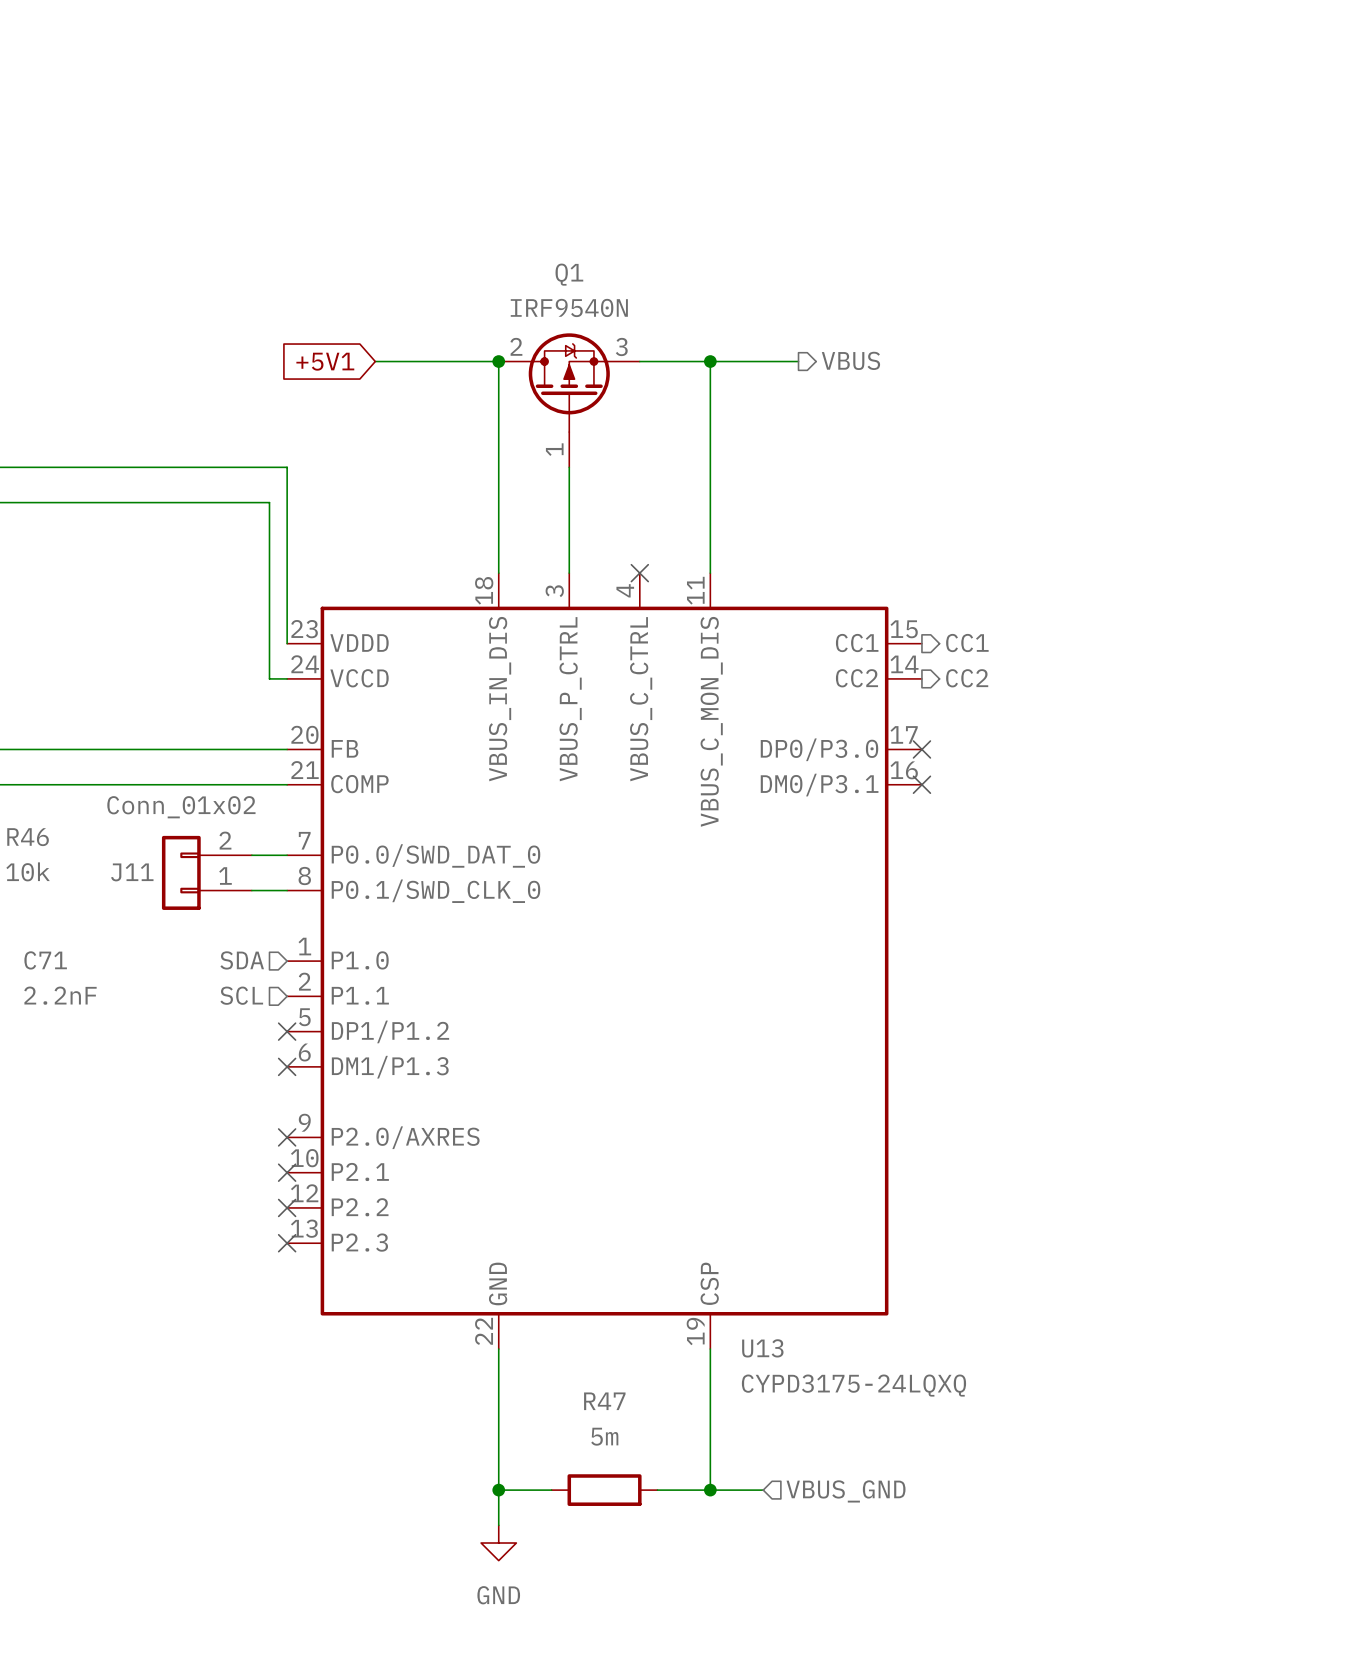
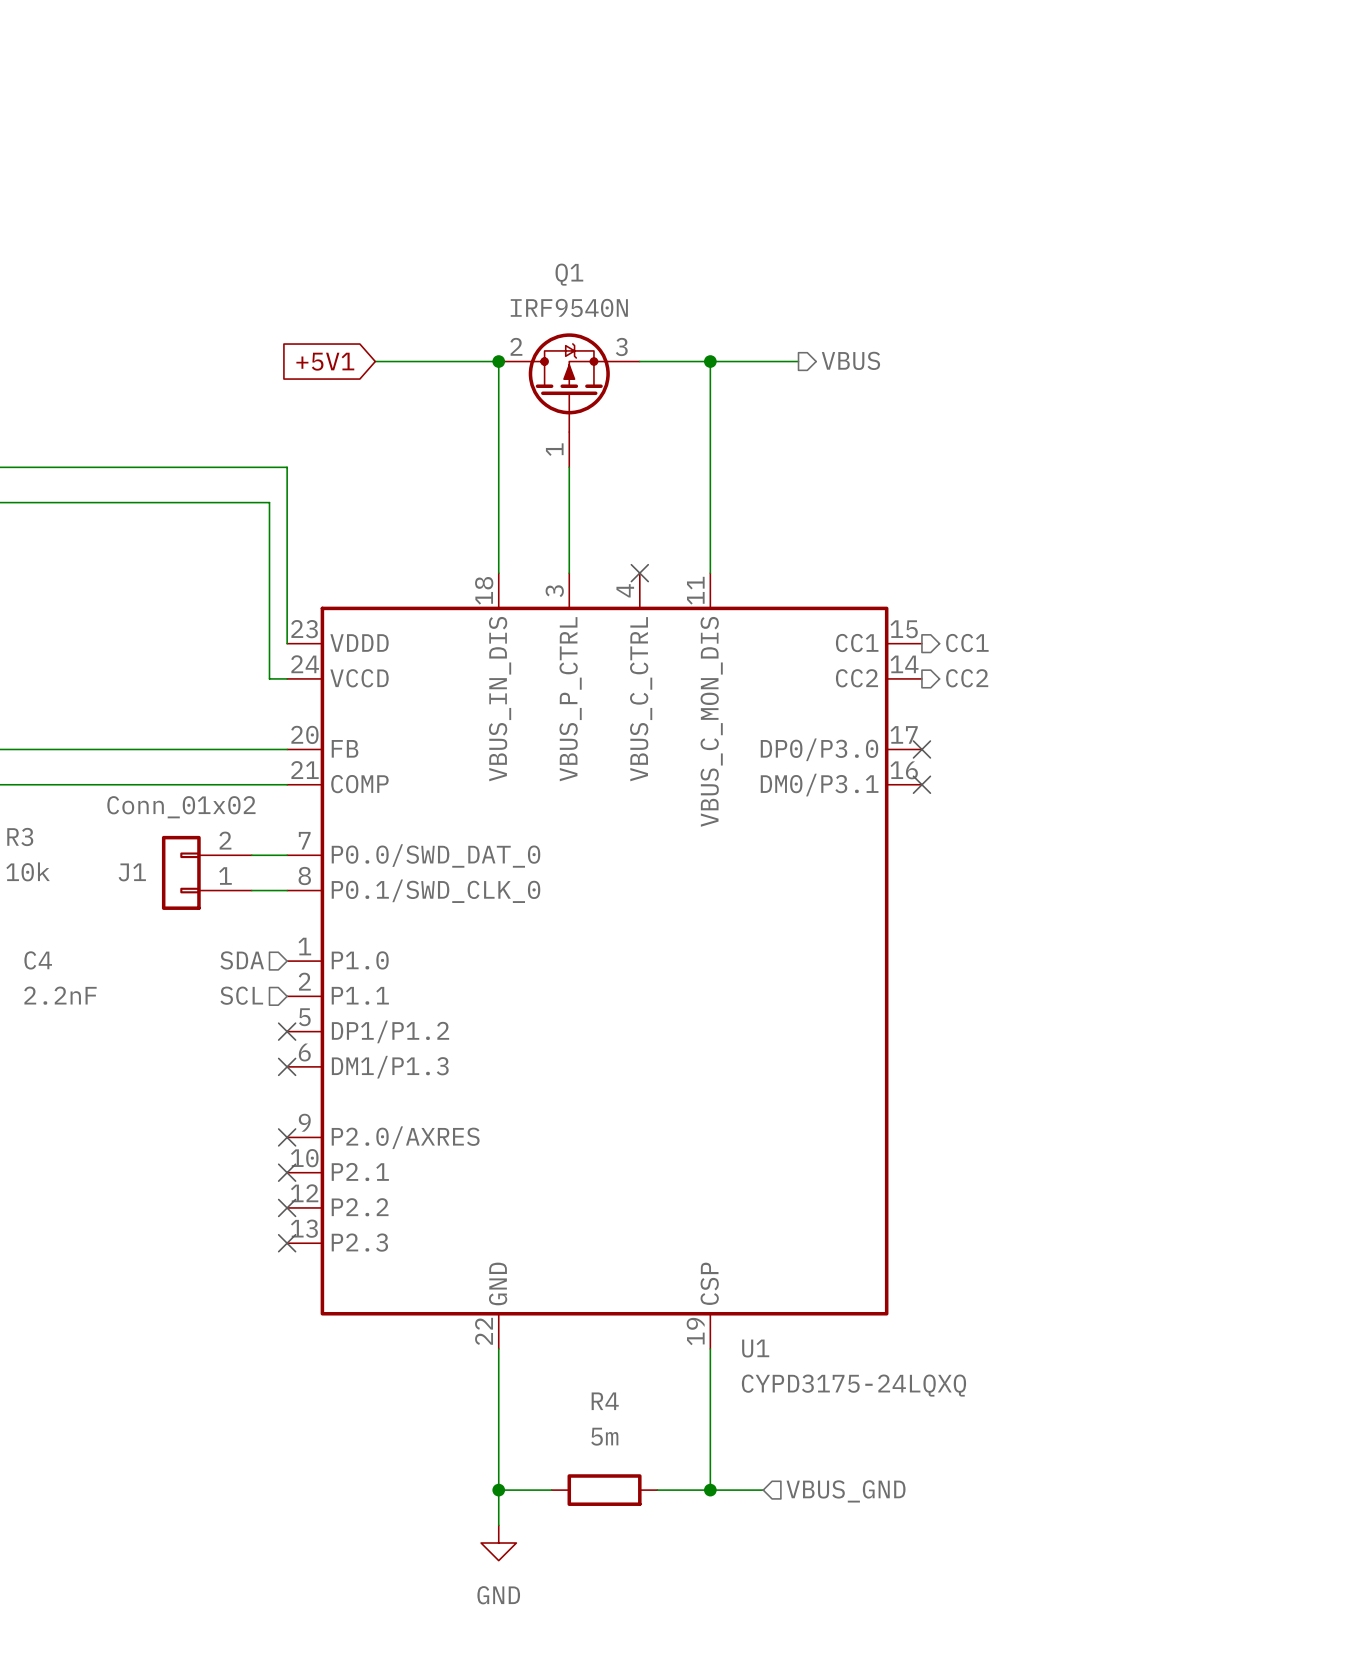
R46 name: R46 (28, 837) -> R3 (20, 836)
J11 name: J11 (132, 872) -> J1 (132, 872)
C71 name: C71 (45, 960) -> C4 (38, 960)
U13 name: U13 (762, 1348) -> U1 (755, 1348)
R47 name: R47 (604, 1401) -> R4 (605, 1401)

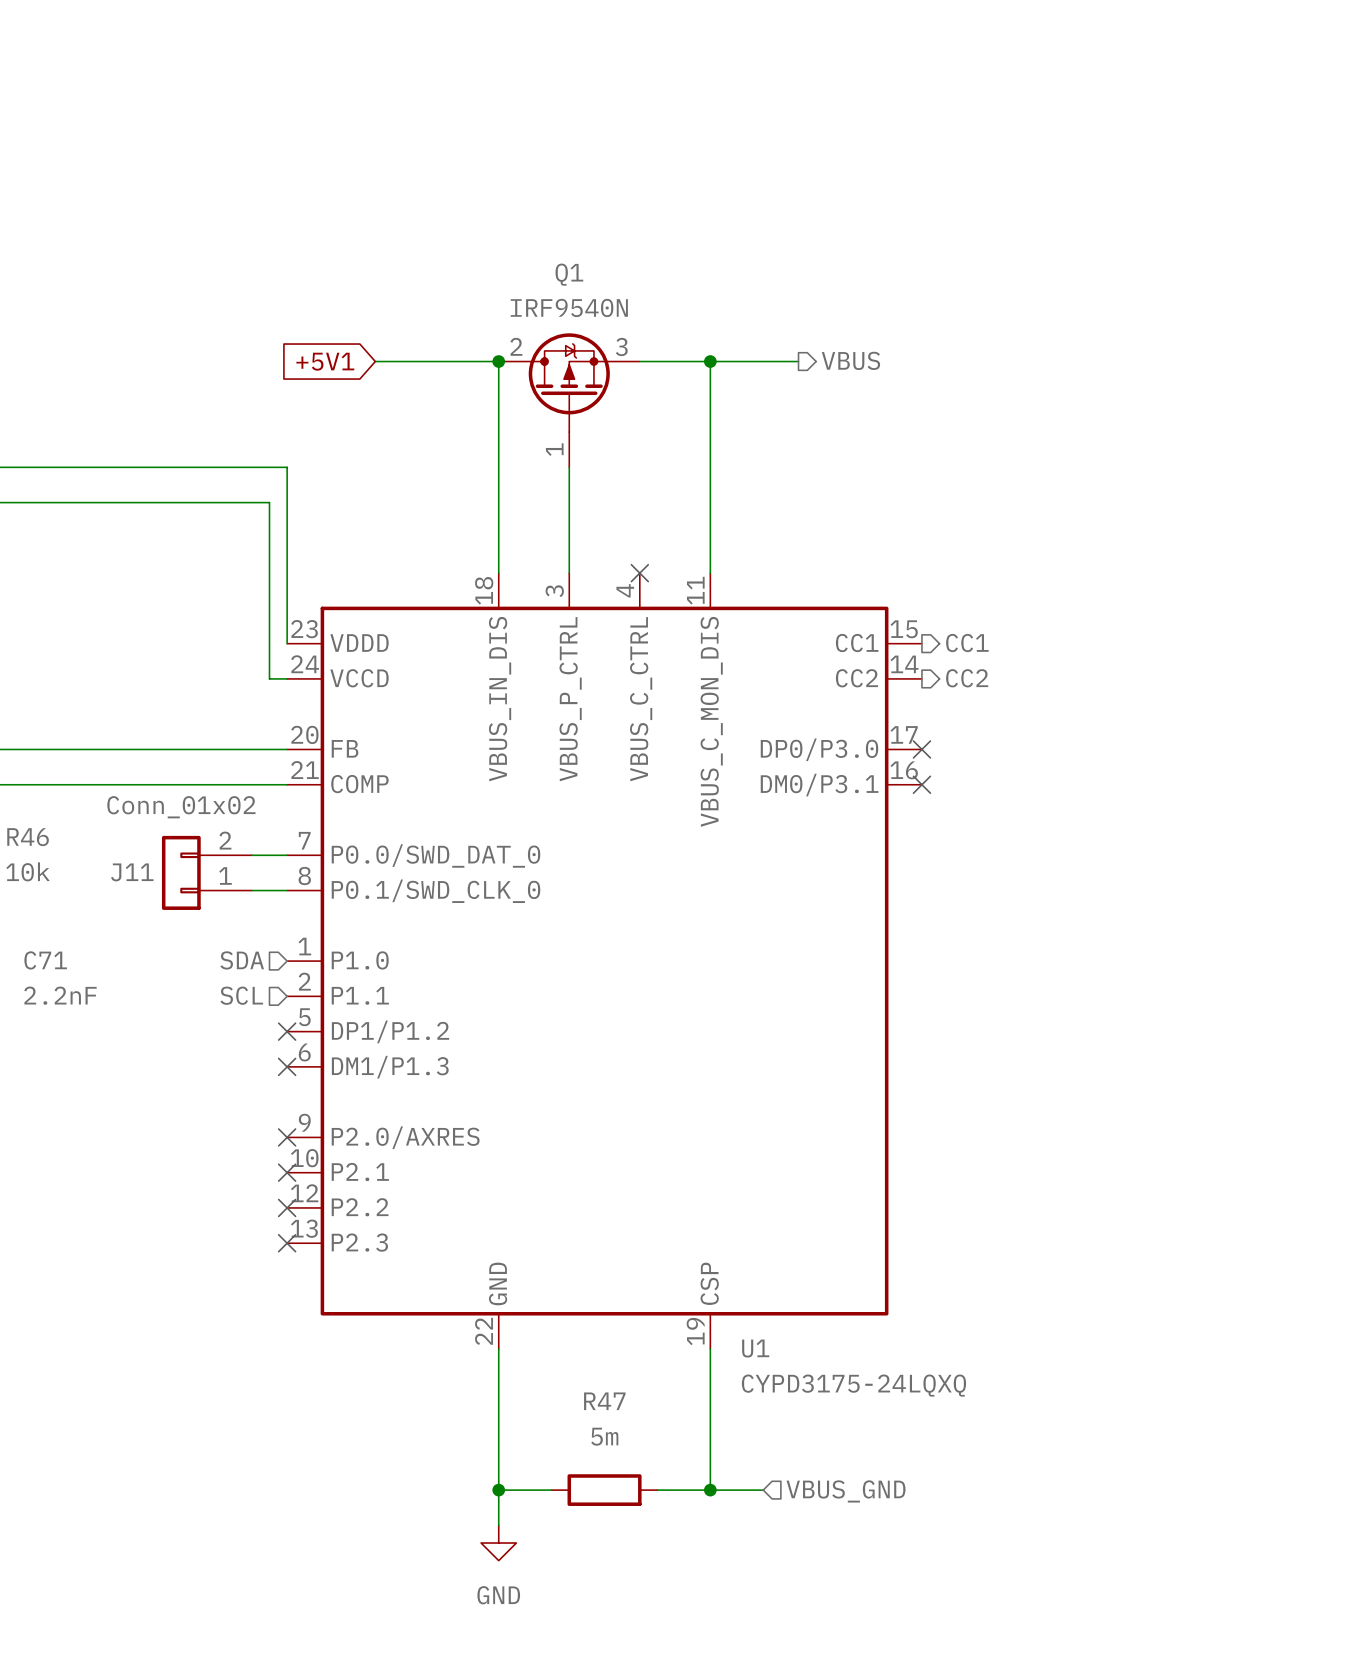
R3 name: R3 (20, 836) -> R46 (28, 837)
J1 name: J1 (132, 872) -> J11 (132, 872)
C4 name: C4 (38, 960) -> C71 (45, 960)
R4 name: R4 (605, 1401) -> R47 (604, 1401)

